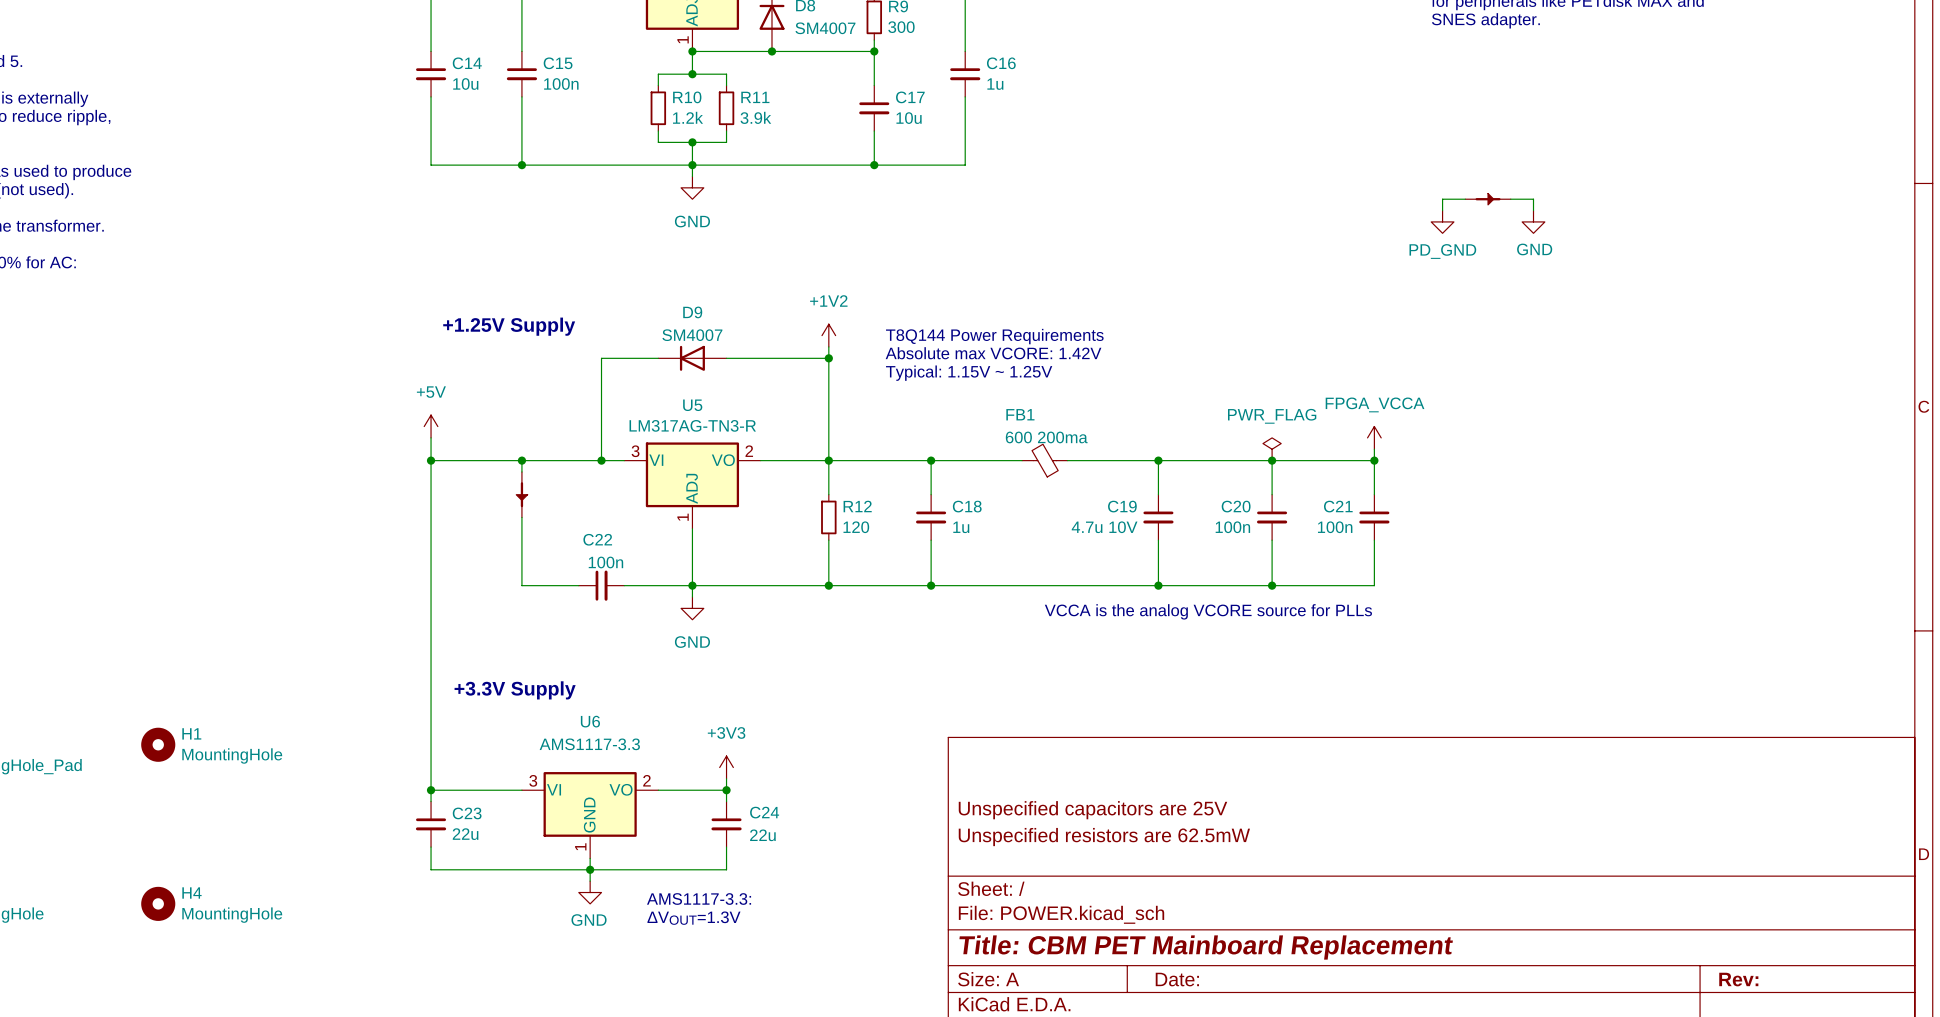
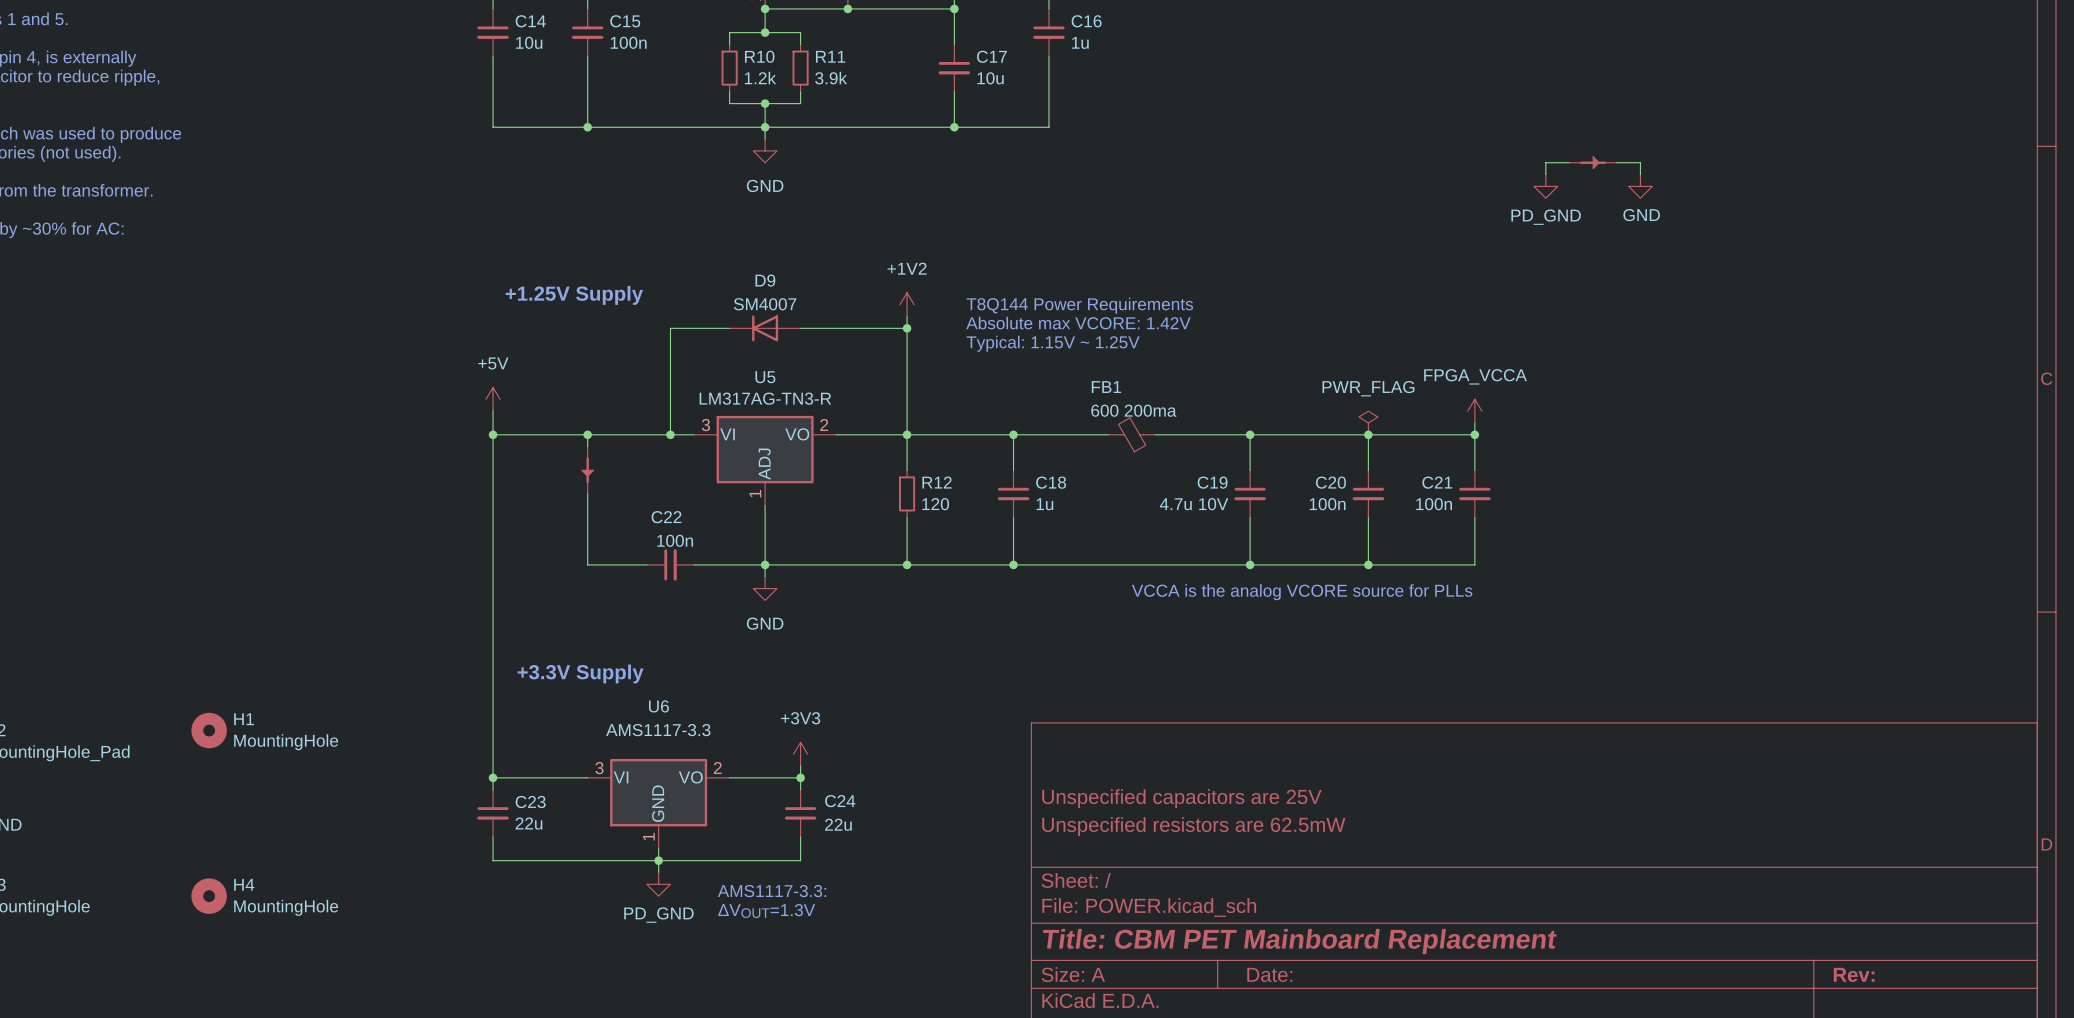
power symbol: GND (590, 892) -> PD_GND (658, 884)

